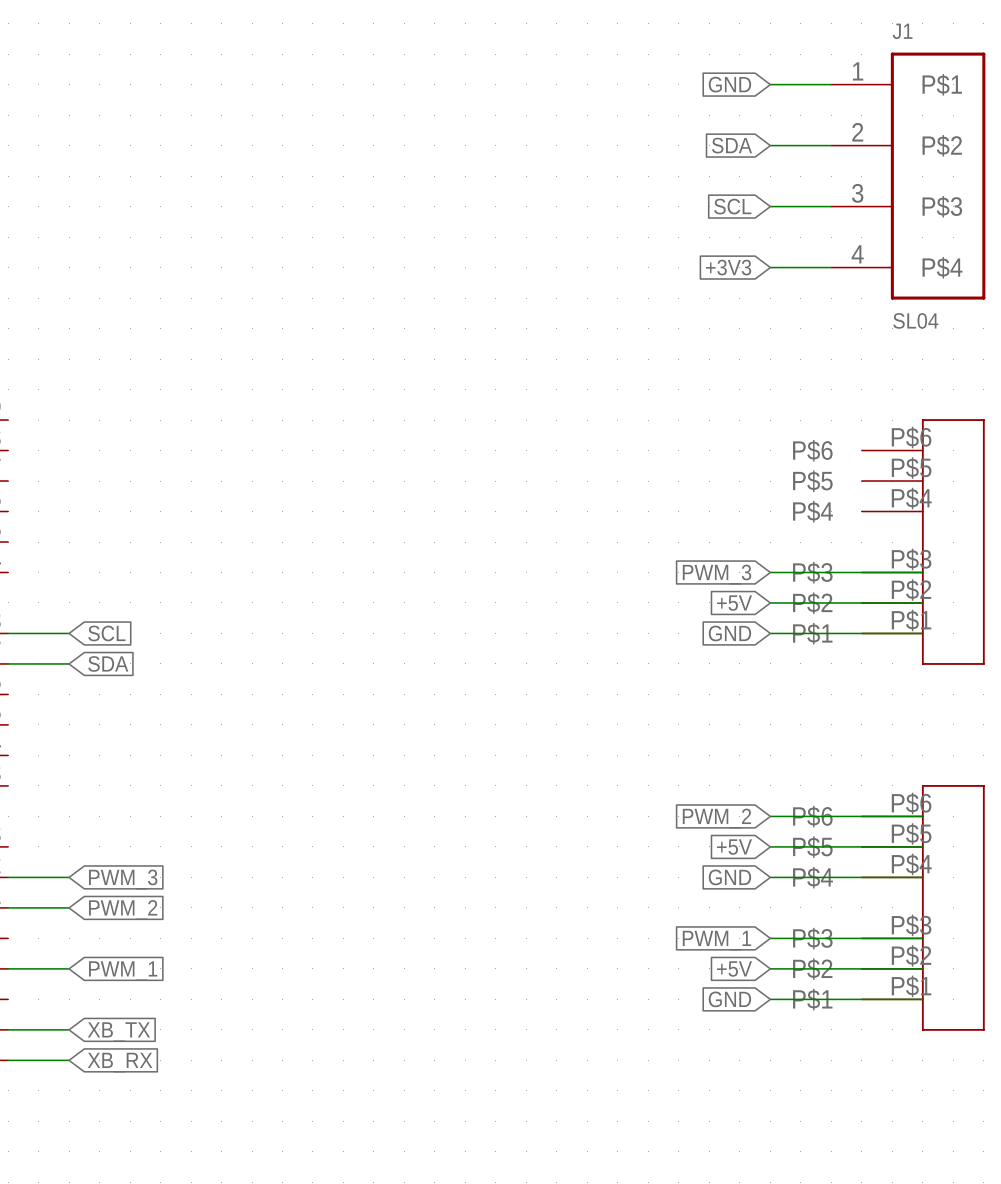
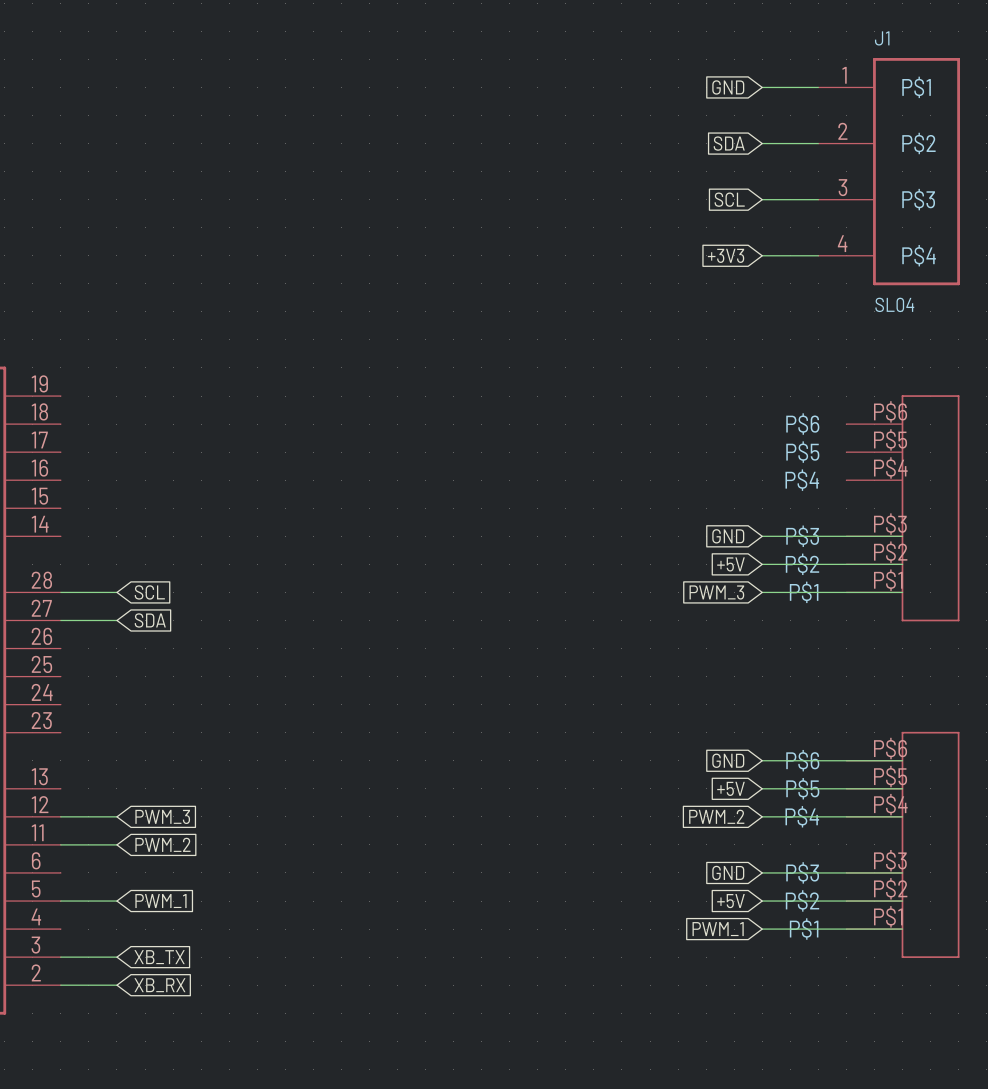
global label: PWM_3 (717, 574) -> GND (728, 536)
global label: GND (729, 633) -> PWM_3 (716, 592)
global label: PWM_2 (716, 818) -> GND (728, 760)
global label: GND (729, 877) -> PWM_2 (716, 816)
global label: PWM_1 (716, 940) -> GND (728, 872)
global label: GND (729, 999) -> PWM_1 (718, 929)

